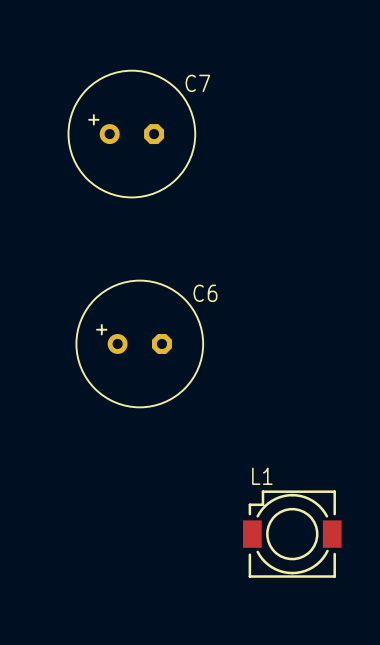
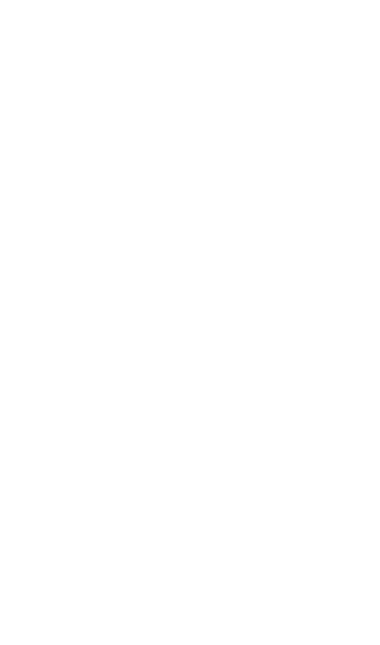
C7: (131, 134) -> none
C6: (139, 343) -> none
L1: (292, 534) -> none

